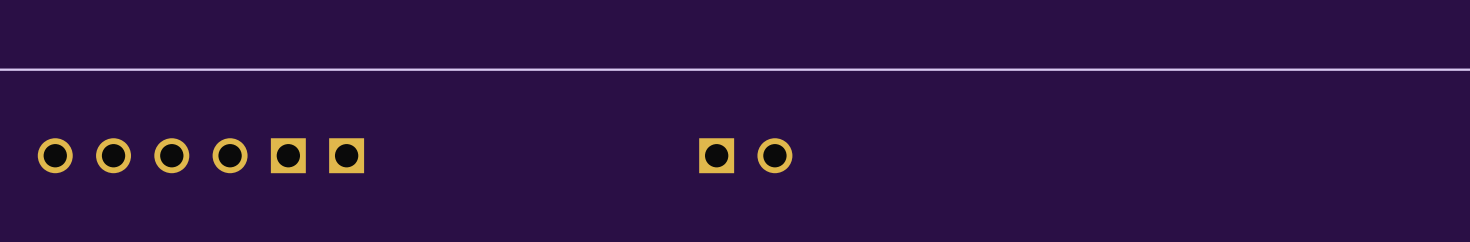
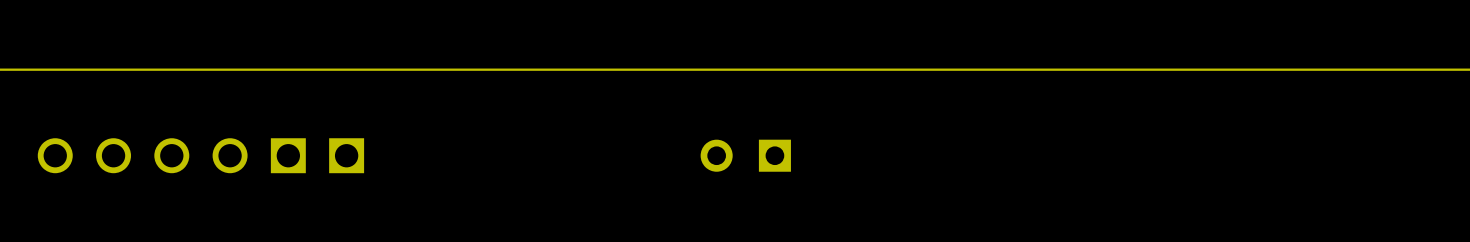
part footprint: [699, 138, 793, 174] -> [700, 139, 791, 172]

